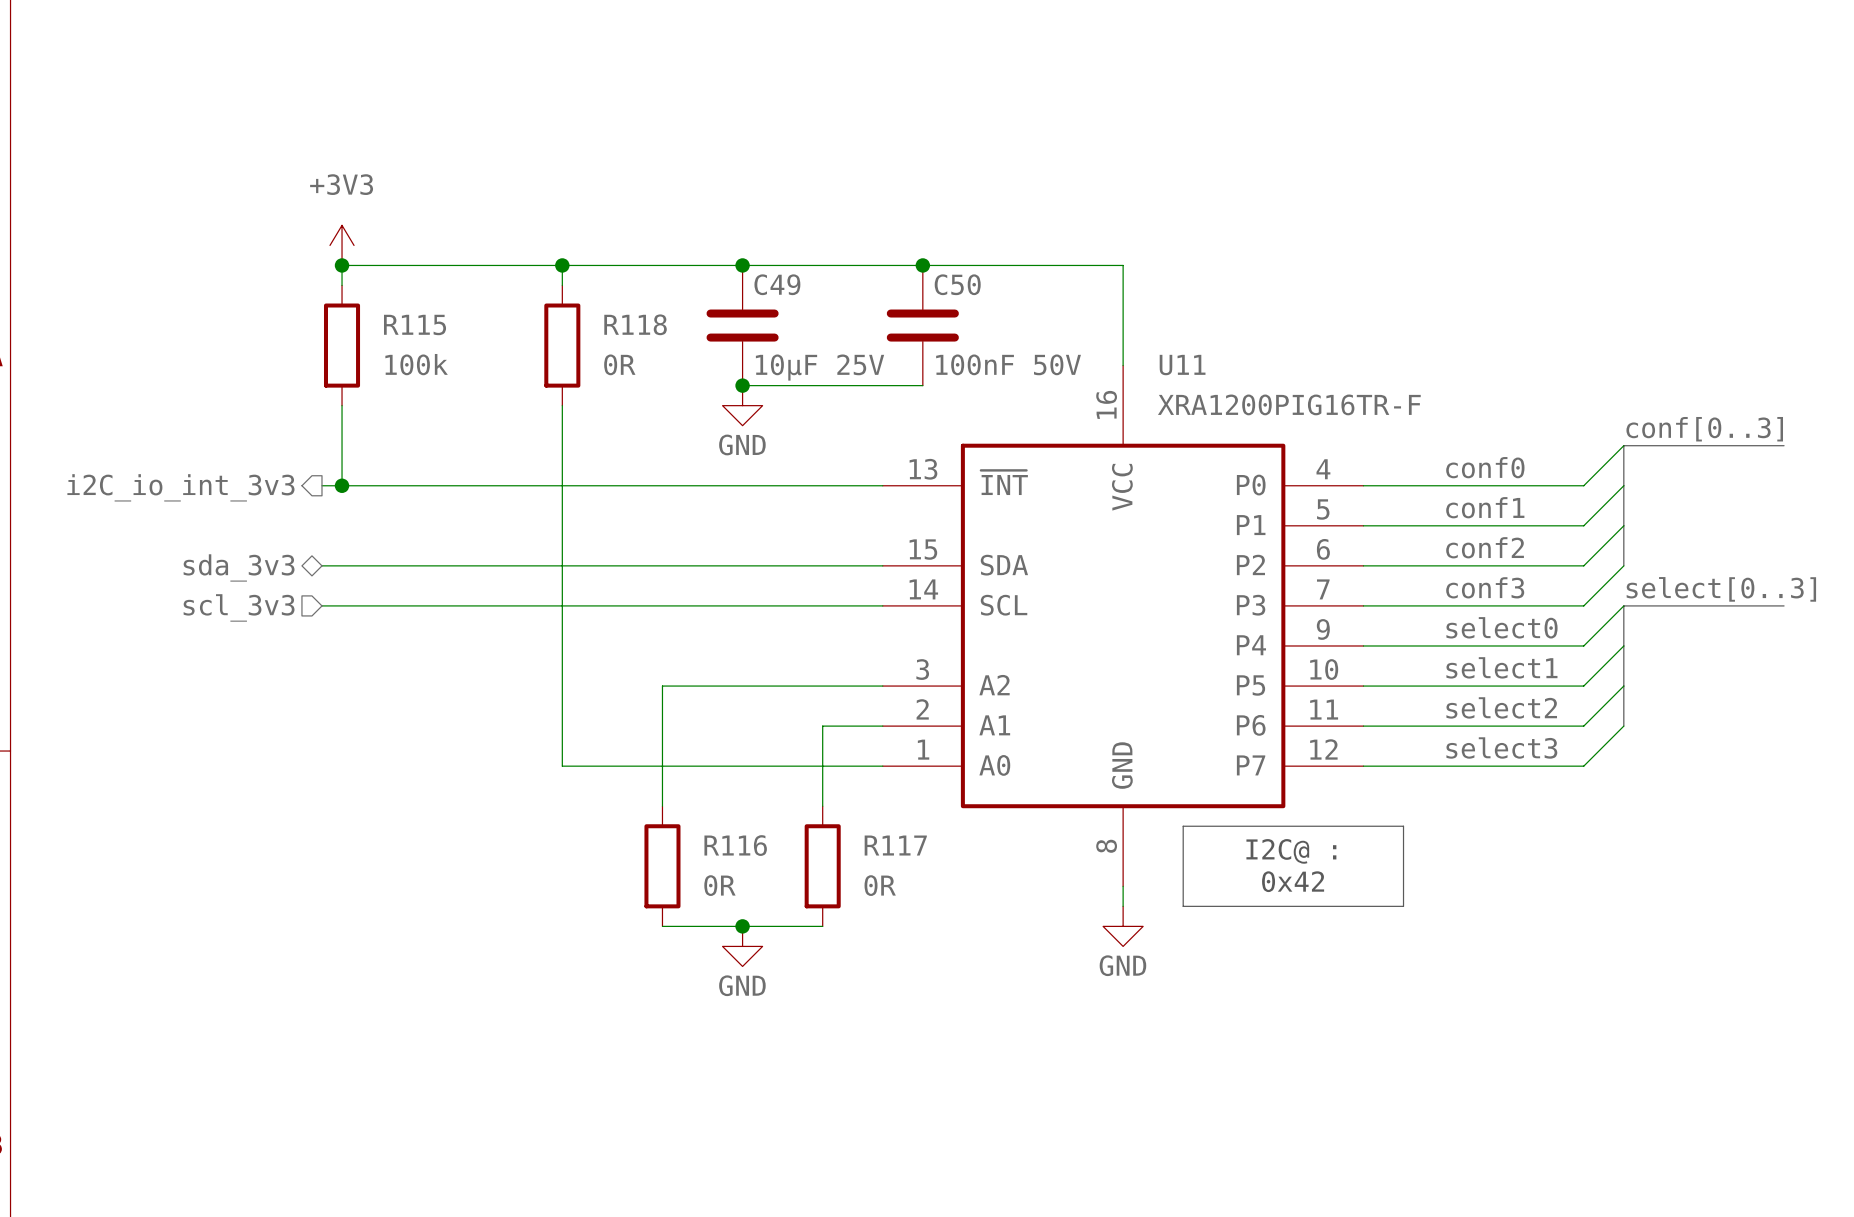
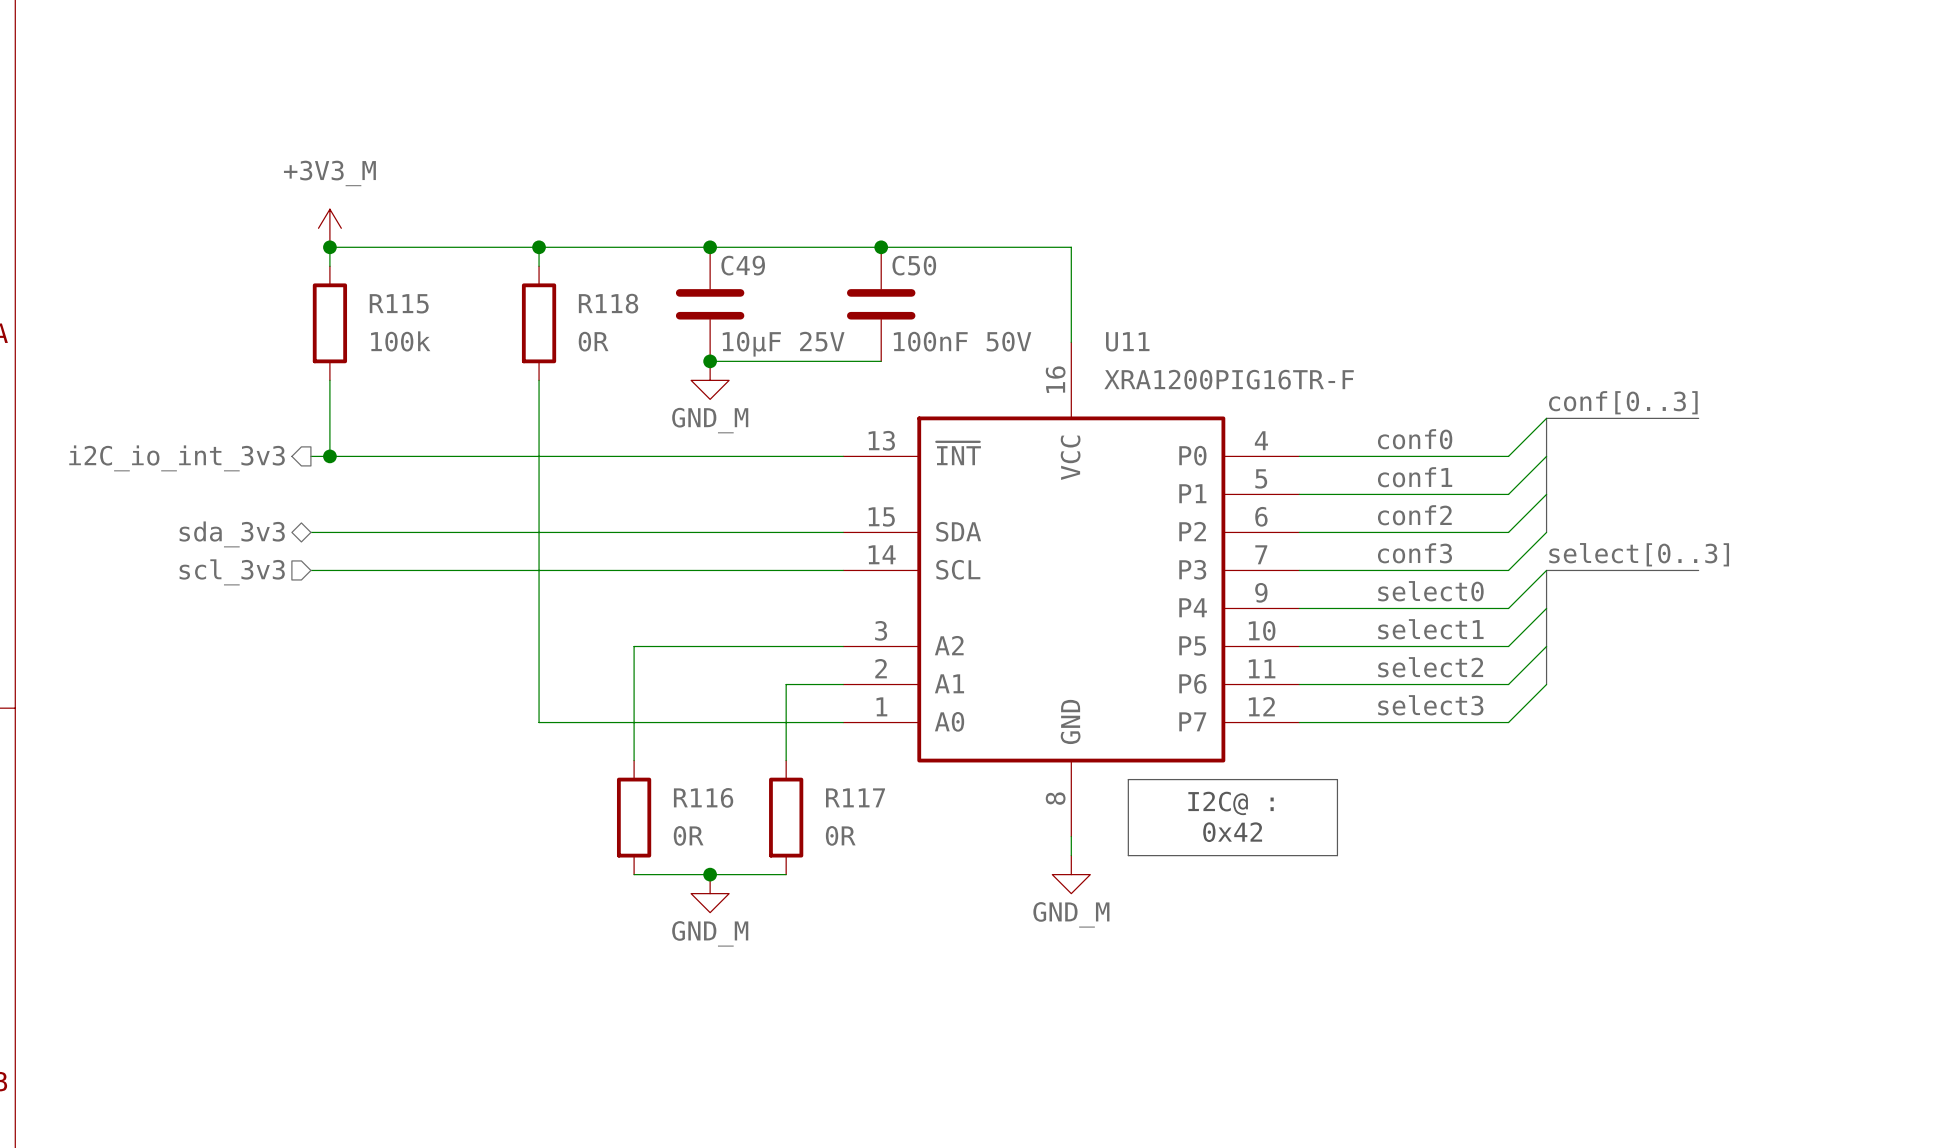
power symbol: +3V3 (342, 245) -> +3V3_M (329, 228)
power symbol: GND (742, 405) -> GND_M (710, 380)
power symbol: GND (1123, 926) -> GND_M (1071, 874)
power symbol: GND (742, 946) -> GND_M (710, 893)

